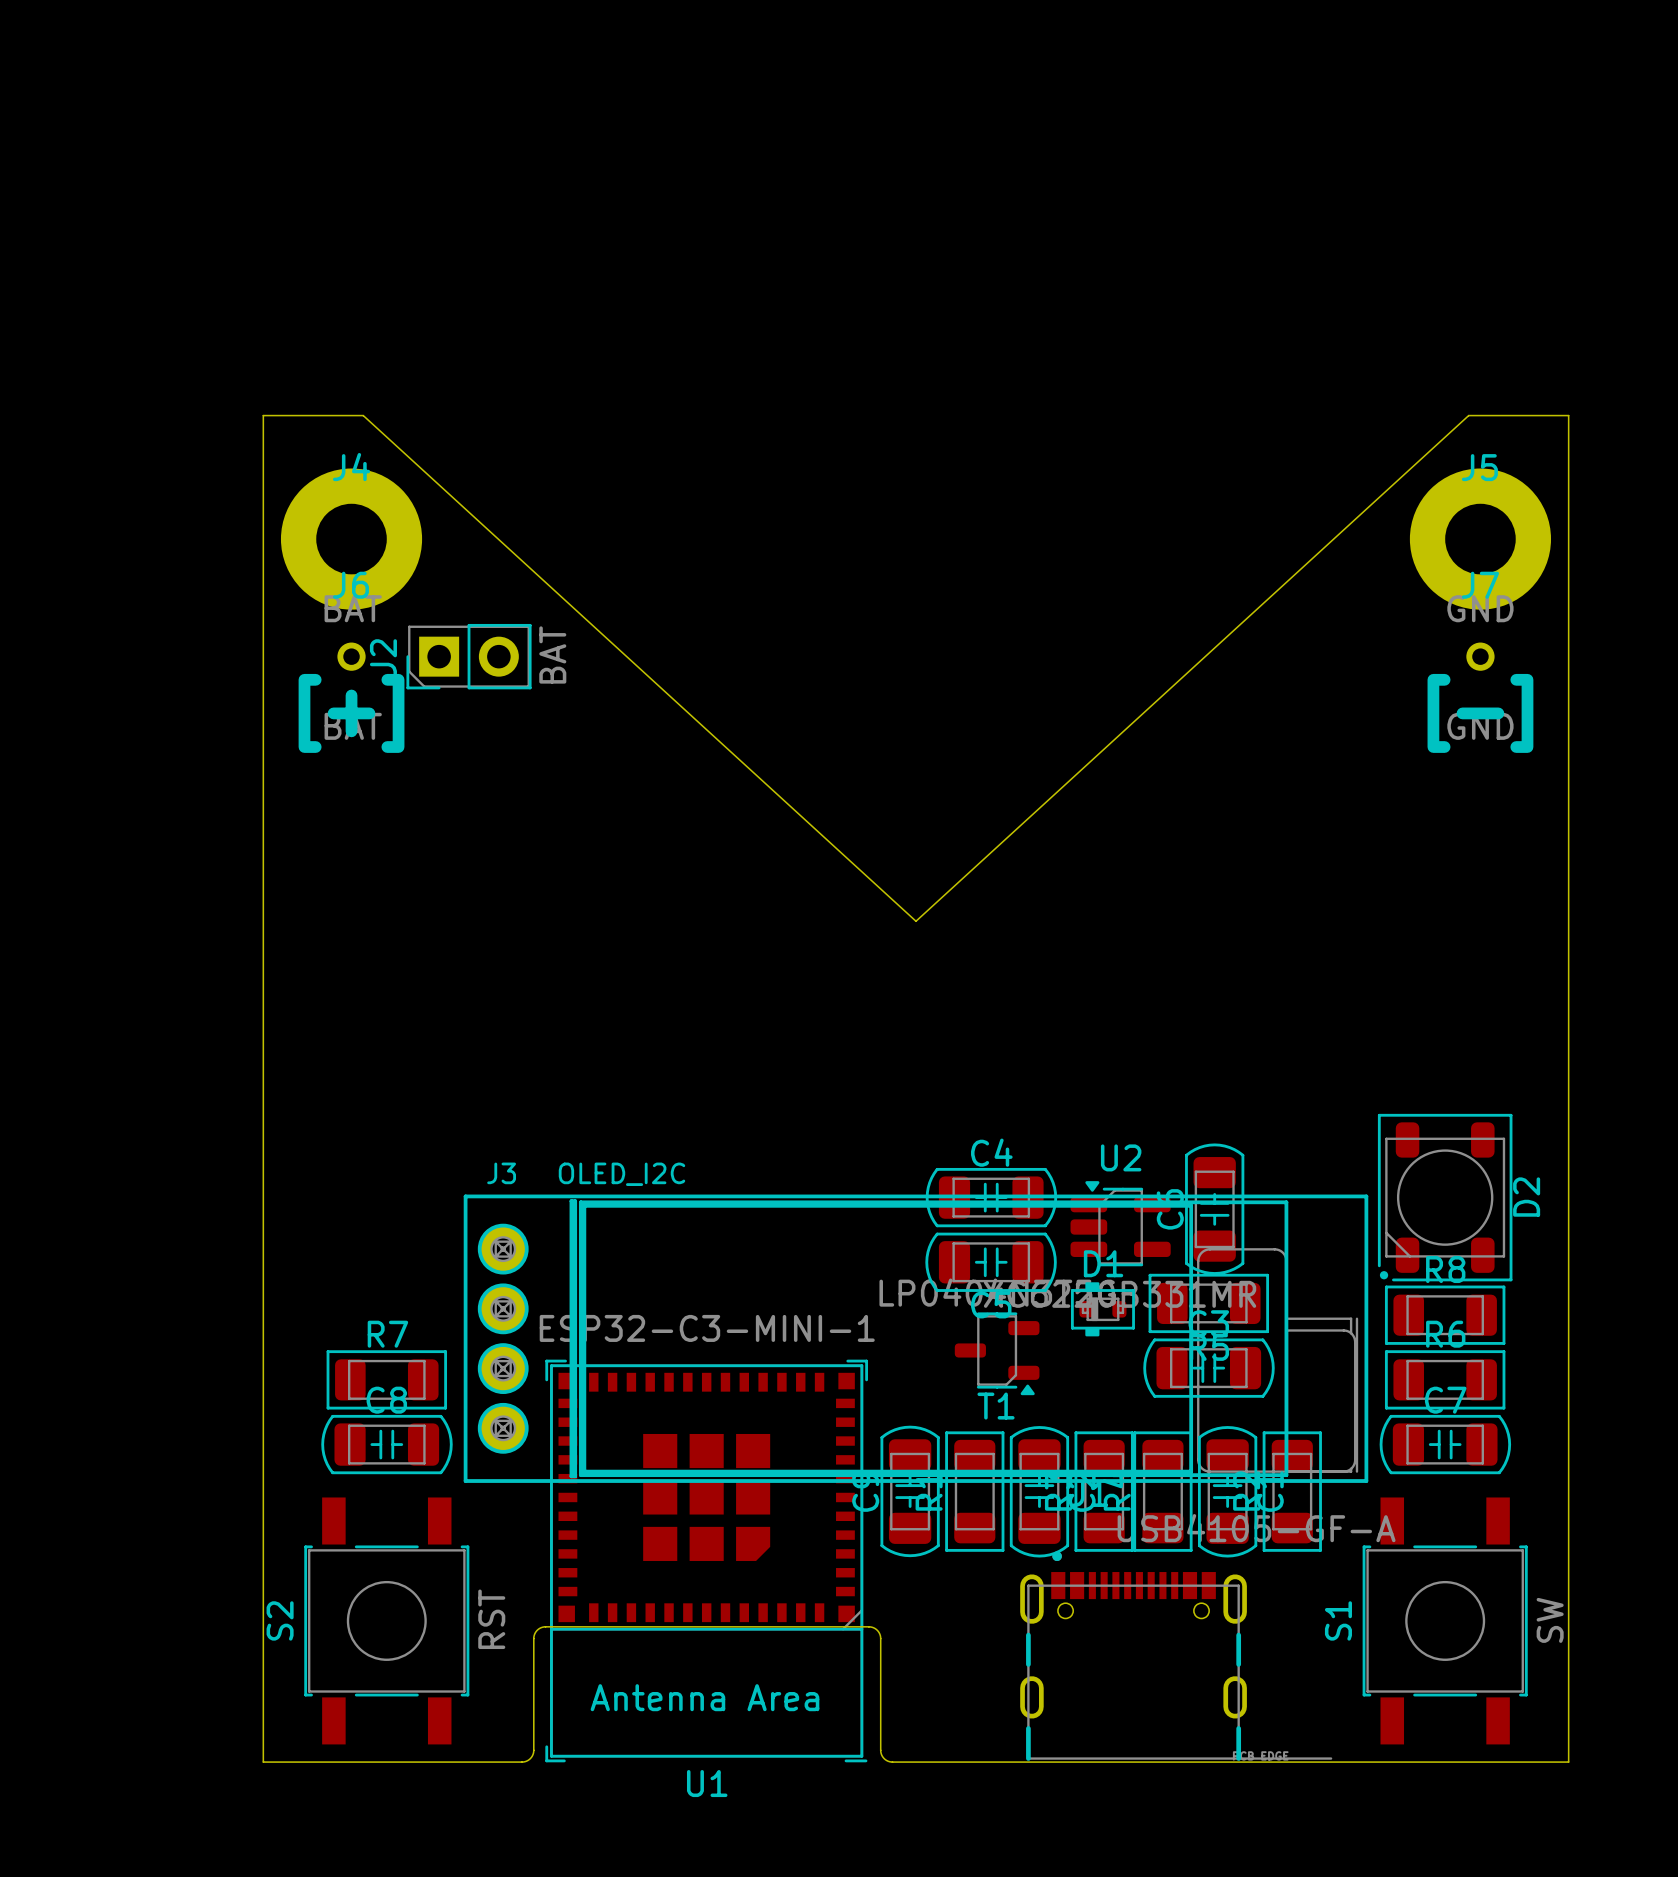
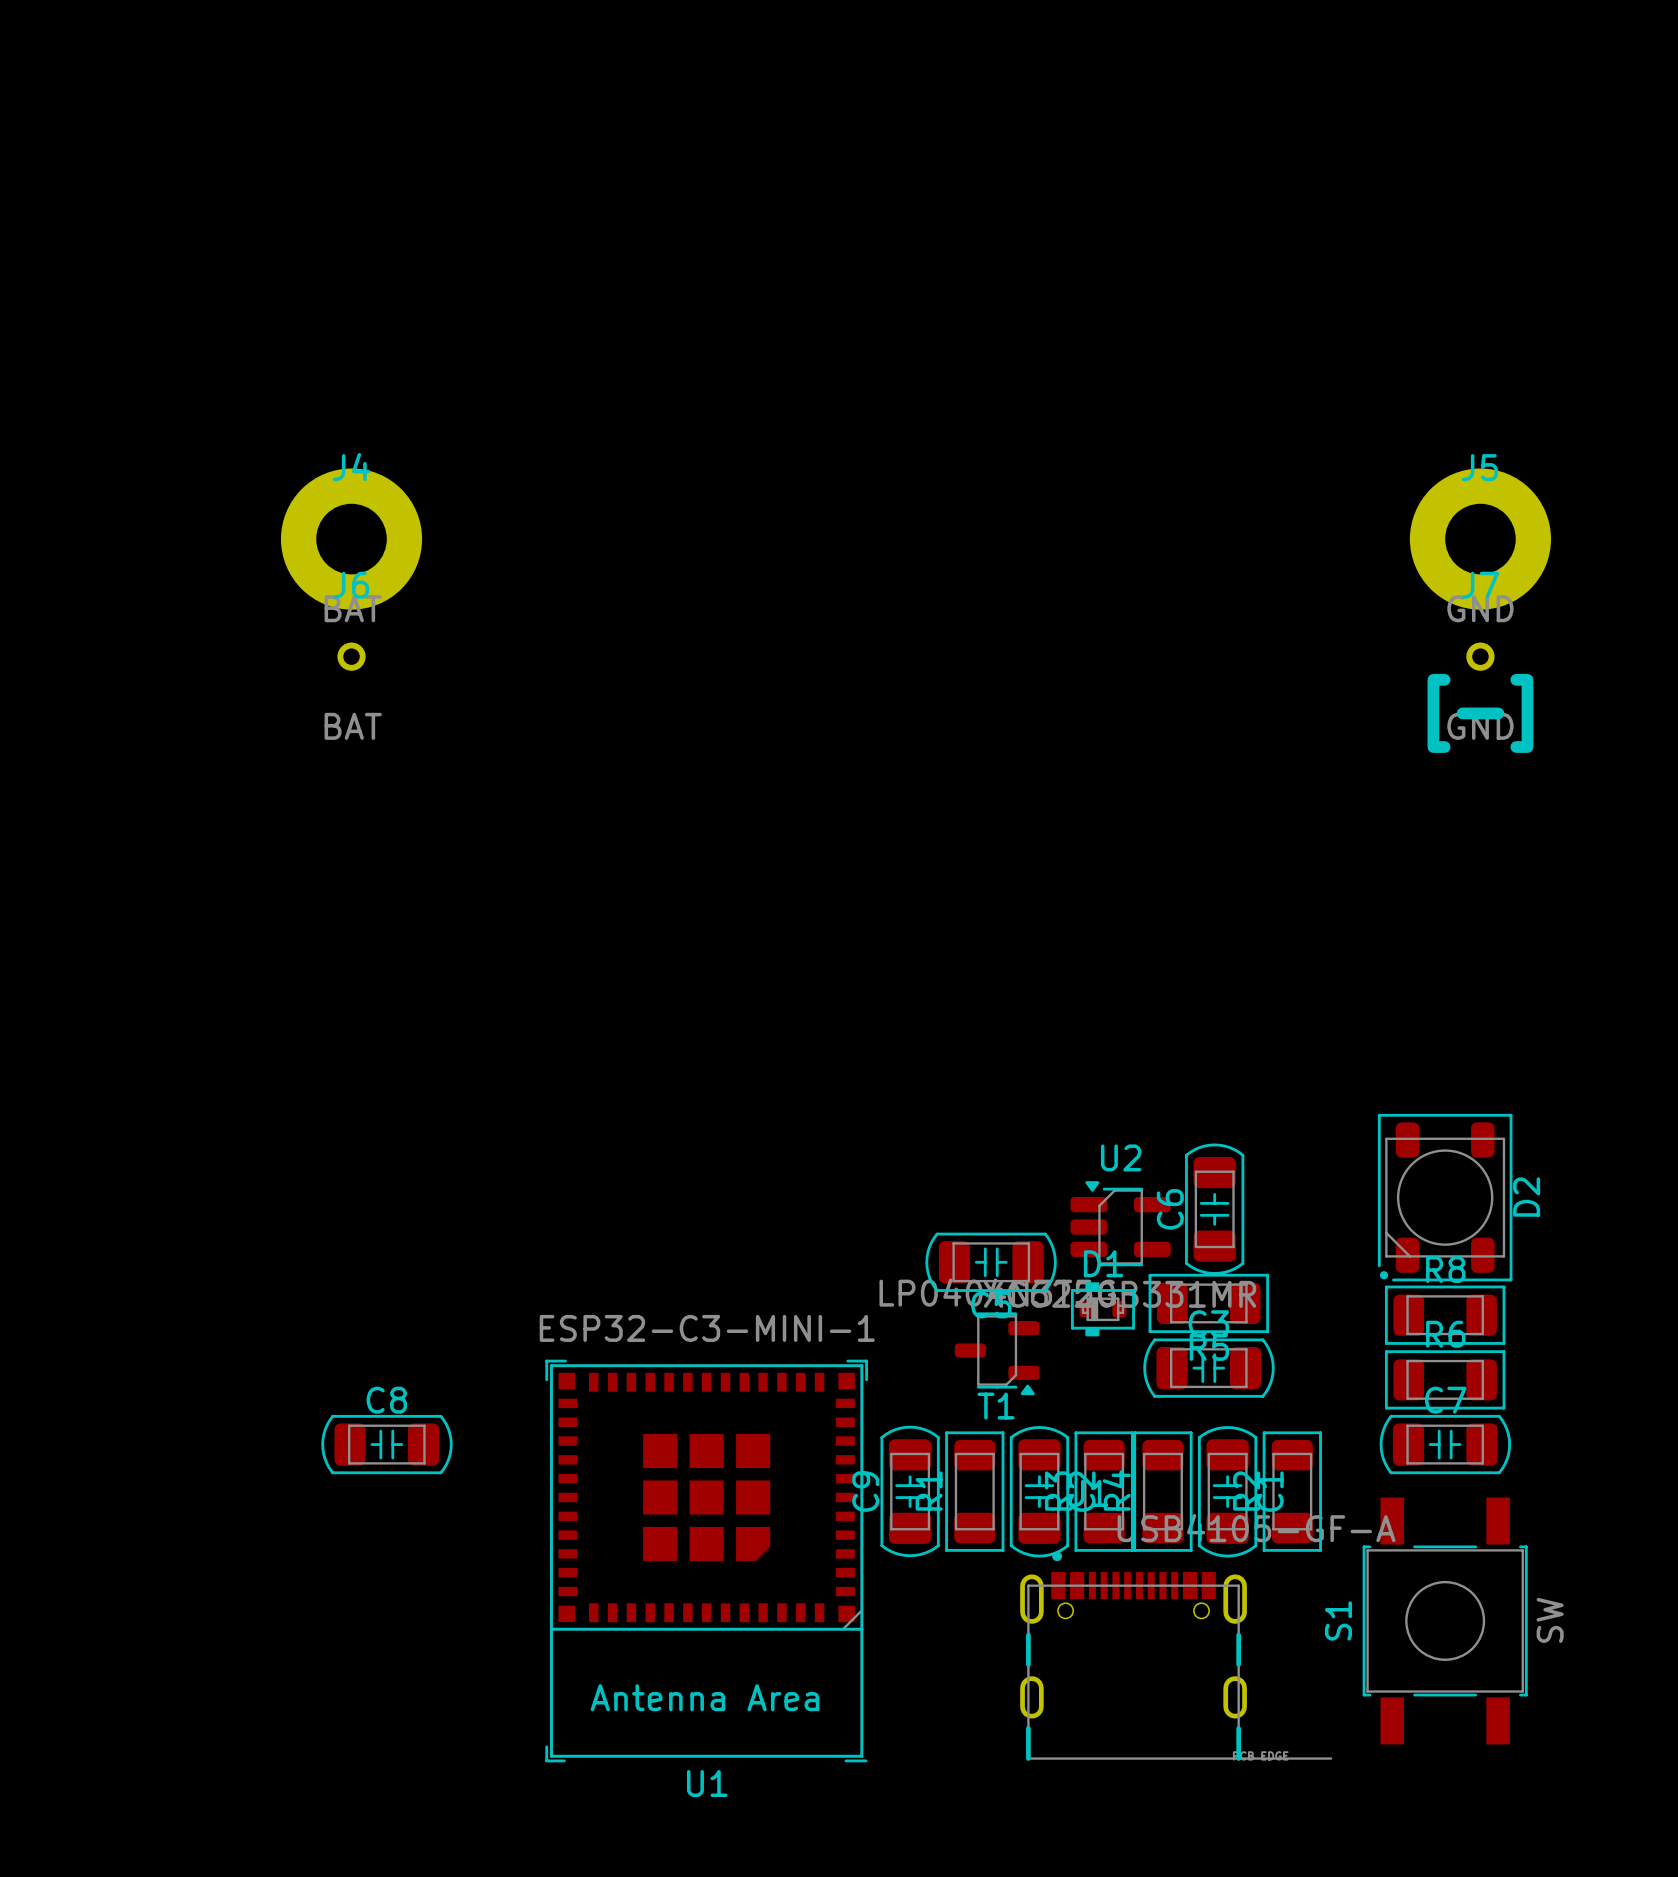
board edge: (263, 415) (263, 1762) (526, 1761) (532, 1756) (533, 1750) (533, 1637) (537, 1630) (545, 1626) (873, 1627) (879, 1632) (880, 1638) (880, 1751) (884, 1758) (890, 1761) (1568, 1762) (1568, 415) (1468, 415) (915, 921) (363, 415) (263, 415) -> none
J2: BAT (469, 656) -> none
text: [+] (351, 713) -> none
C4: (991, 1197) -> none
J3: OLED_I2C (915, 1338) -> none
R7: (386, 1379) -> none
S2: RST (386, 1620) -> none

